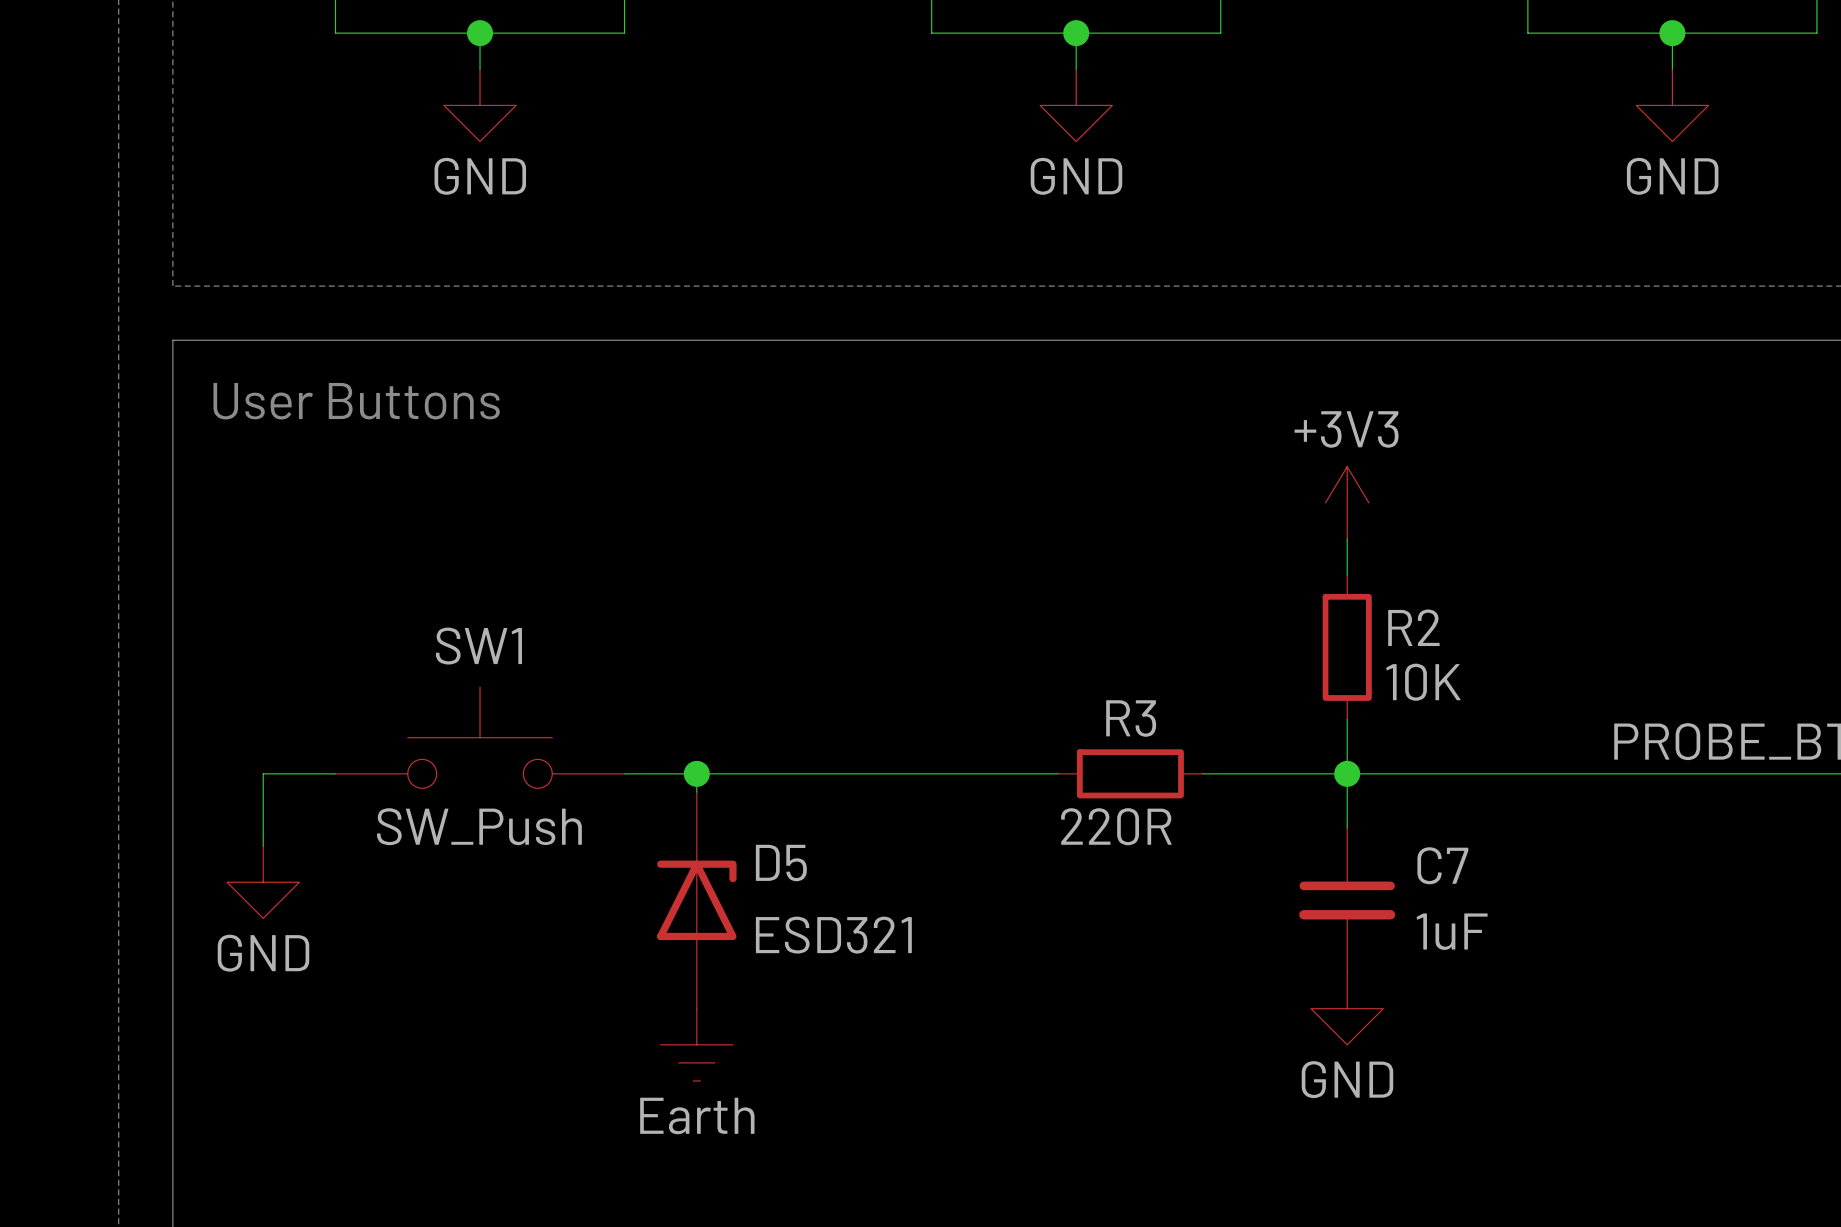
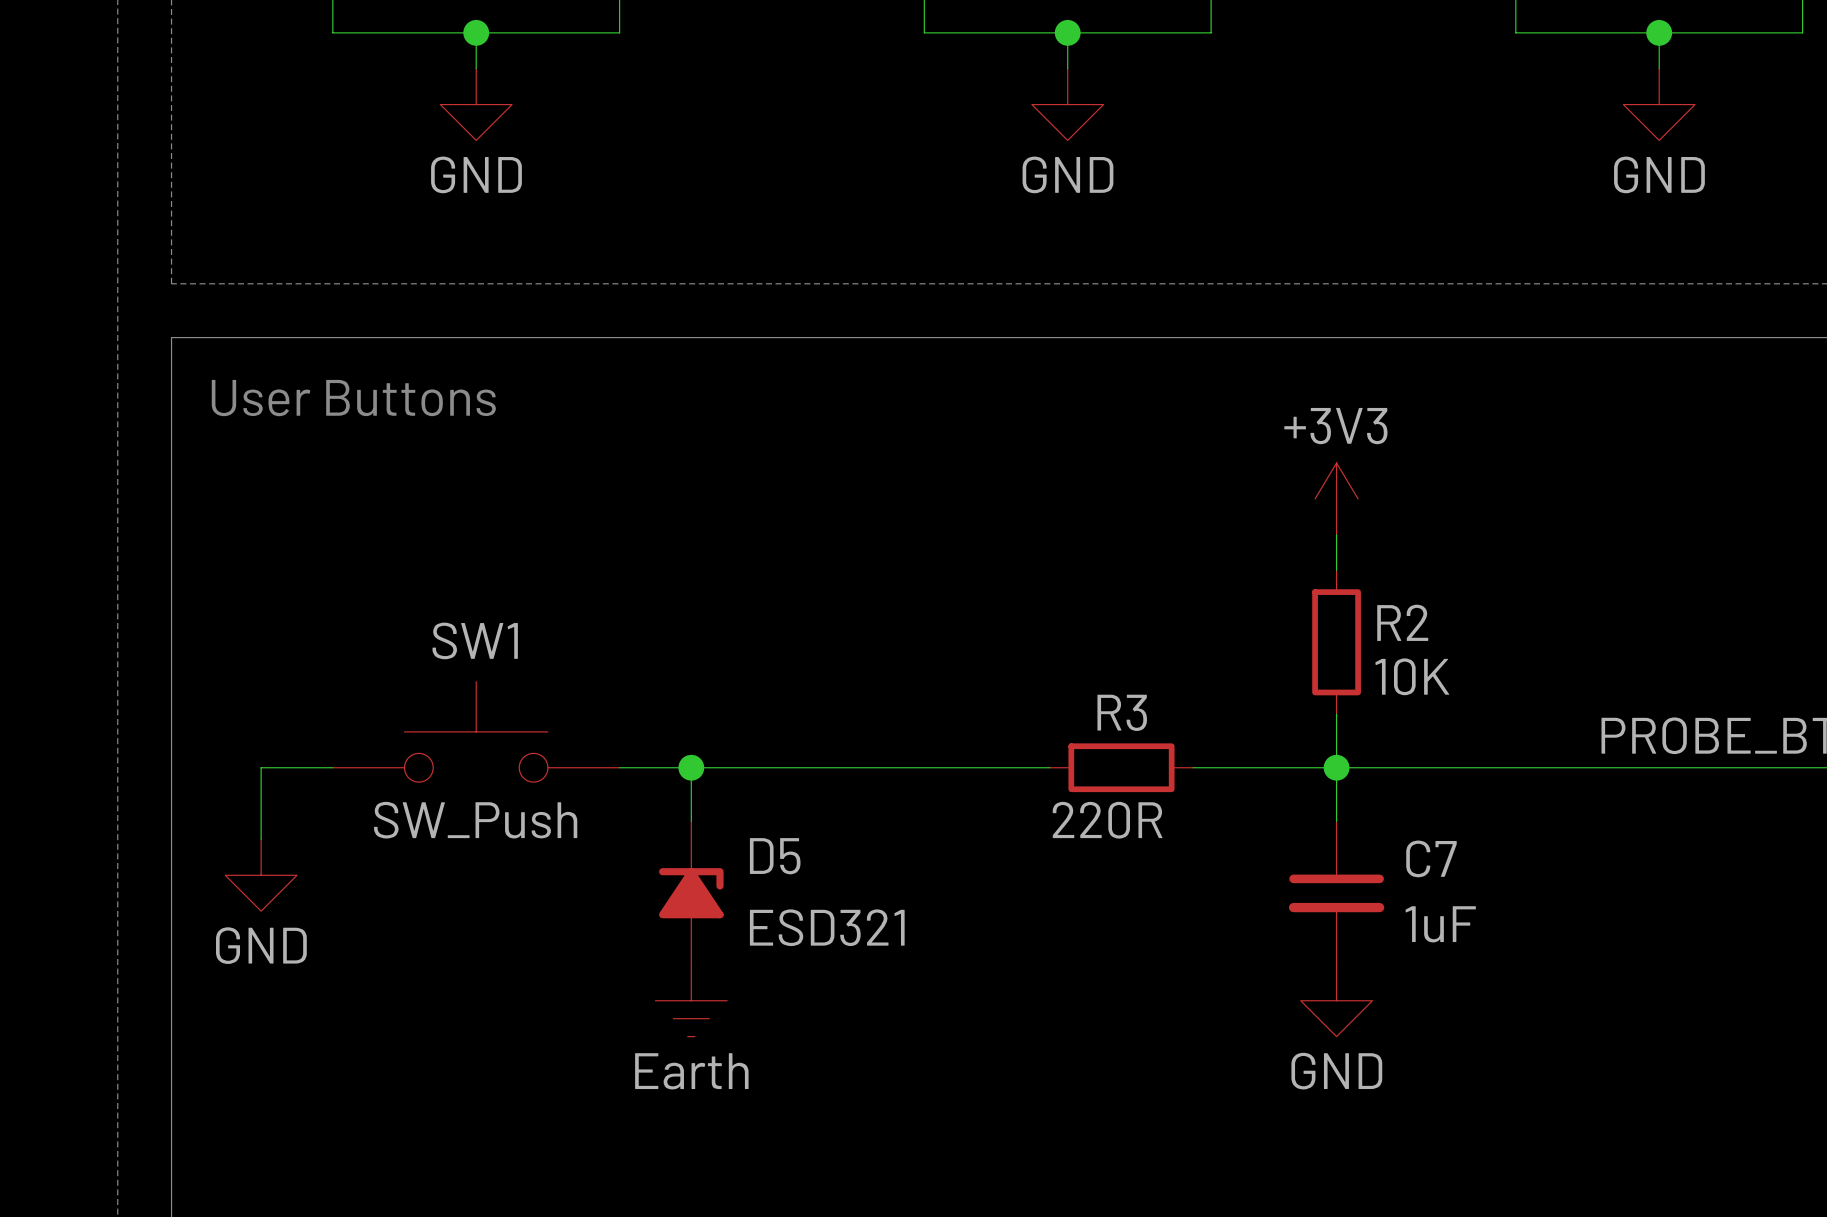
D5 symbol: [657, 791, 737, 1009] -> [659, 821, 724, 965]
power symbol position: Earth (696, 1044) -> Earth (691, 1000)

